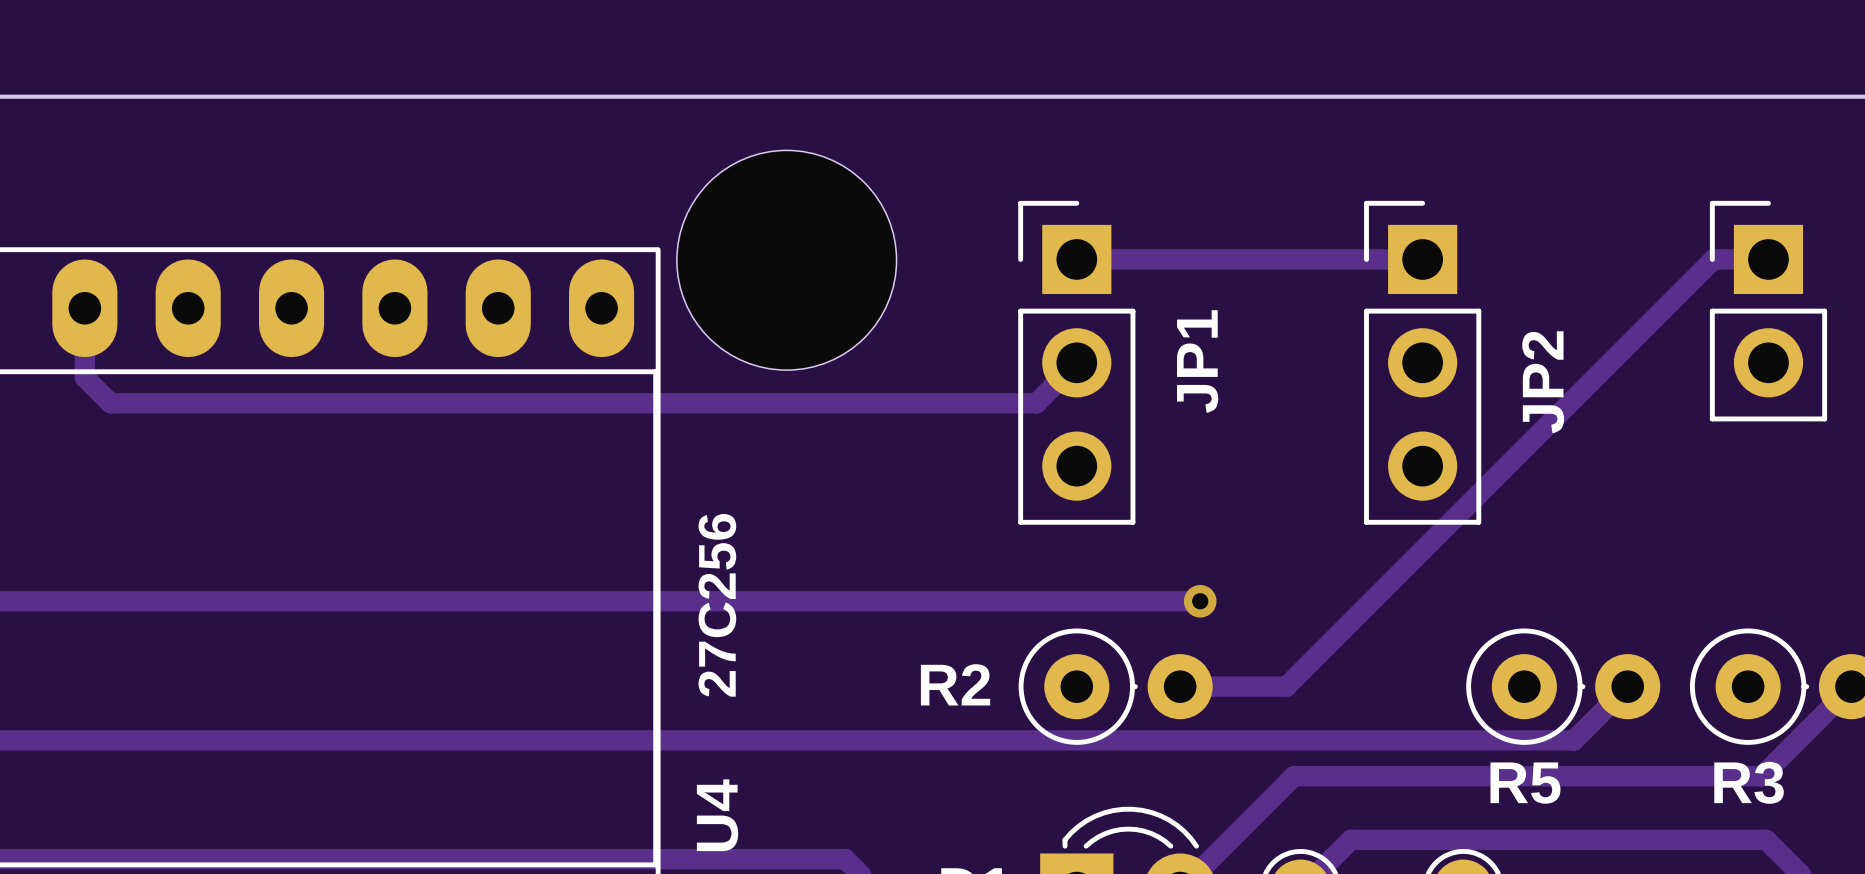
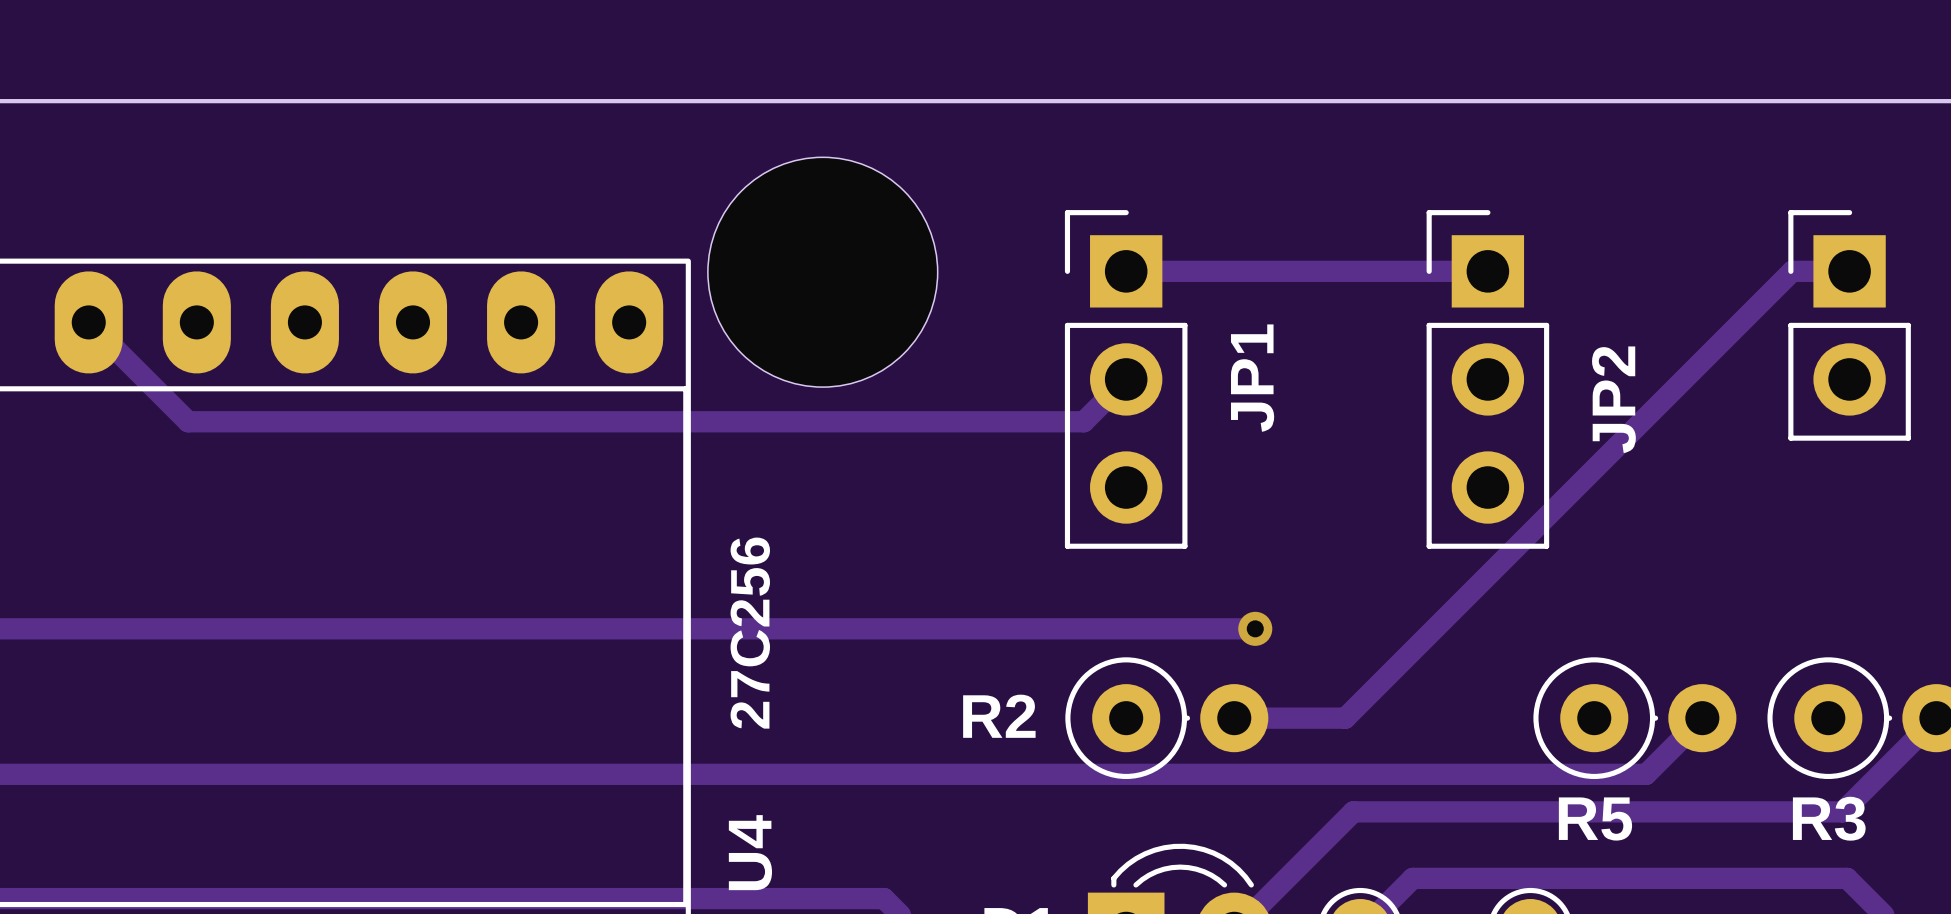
track: (84, 308) (84, 377) (110, 403) (179, 403) -> (88, 322) (188, 421)

